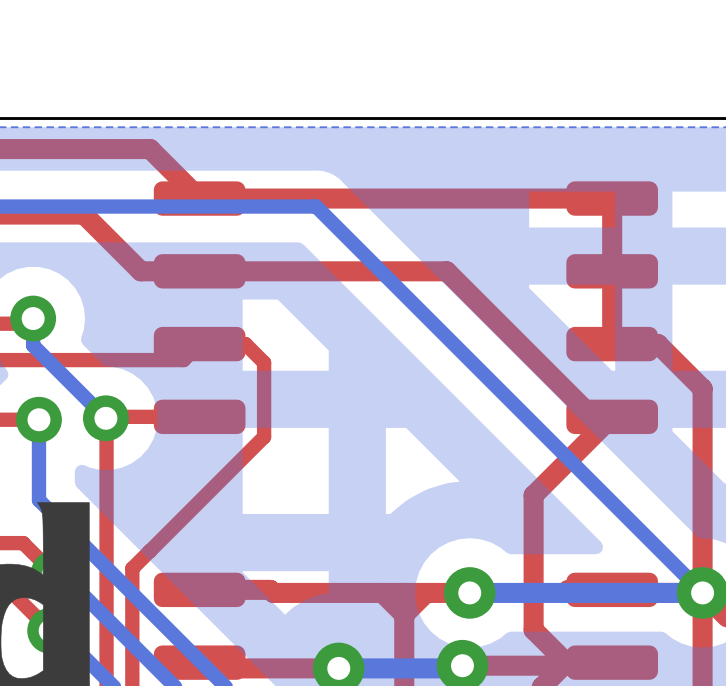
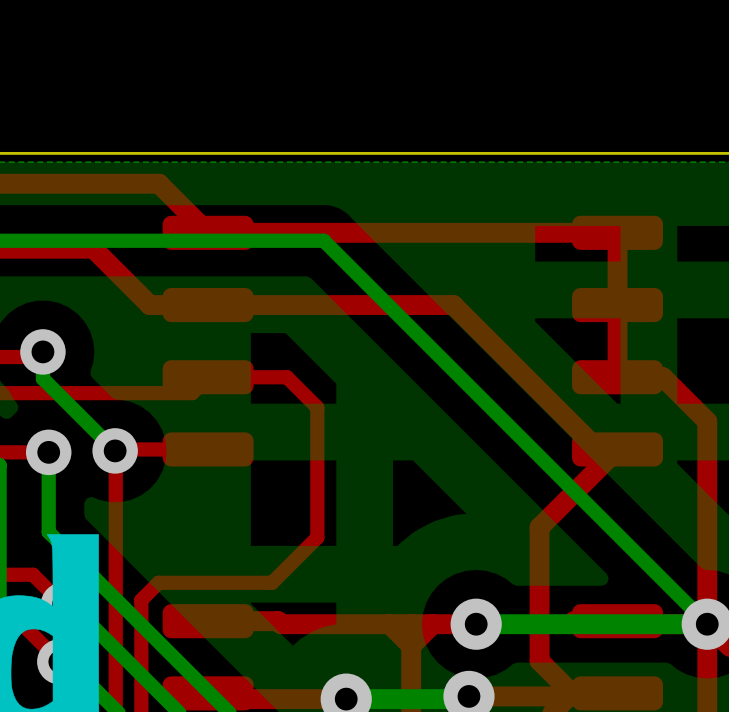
top track: (245, 344) (264, 362) (264, 436) (149, 551) -> (253, 377) (287, 377) (317, 407) (317, 537) (272, 582) (158, 582)

